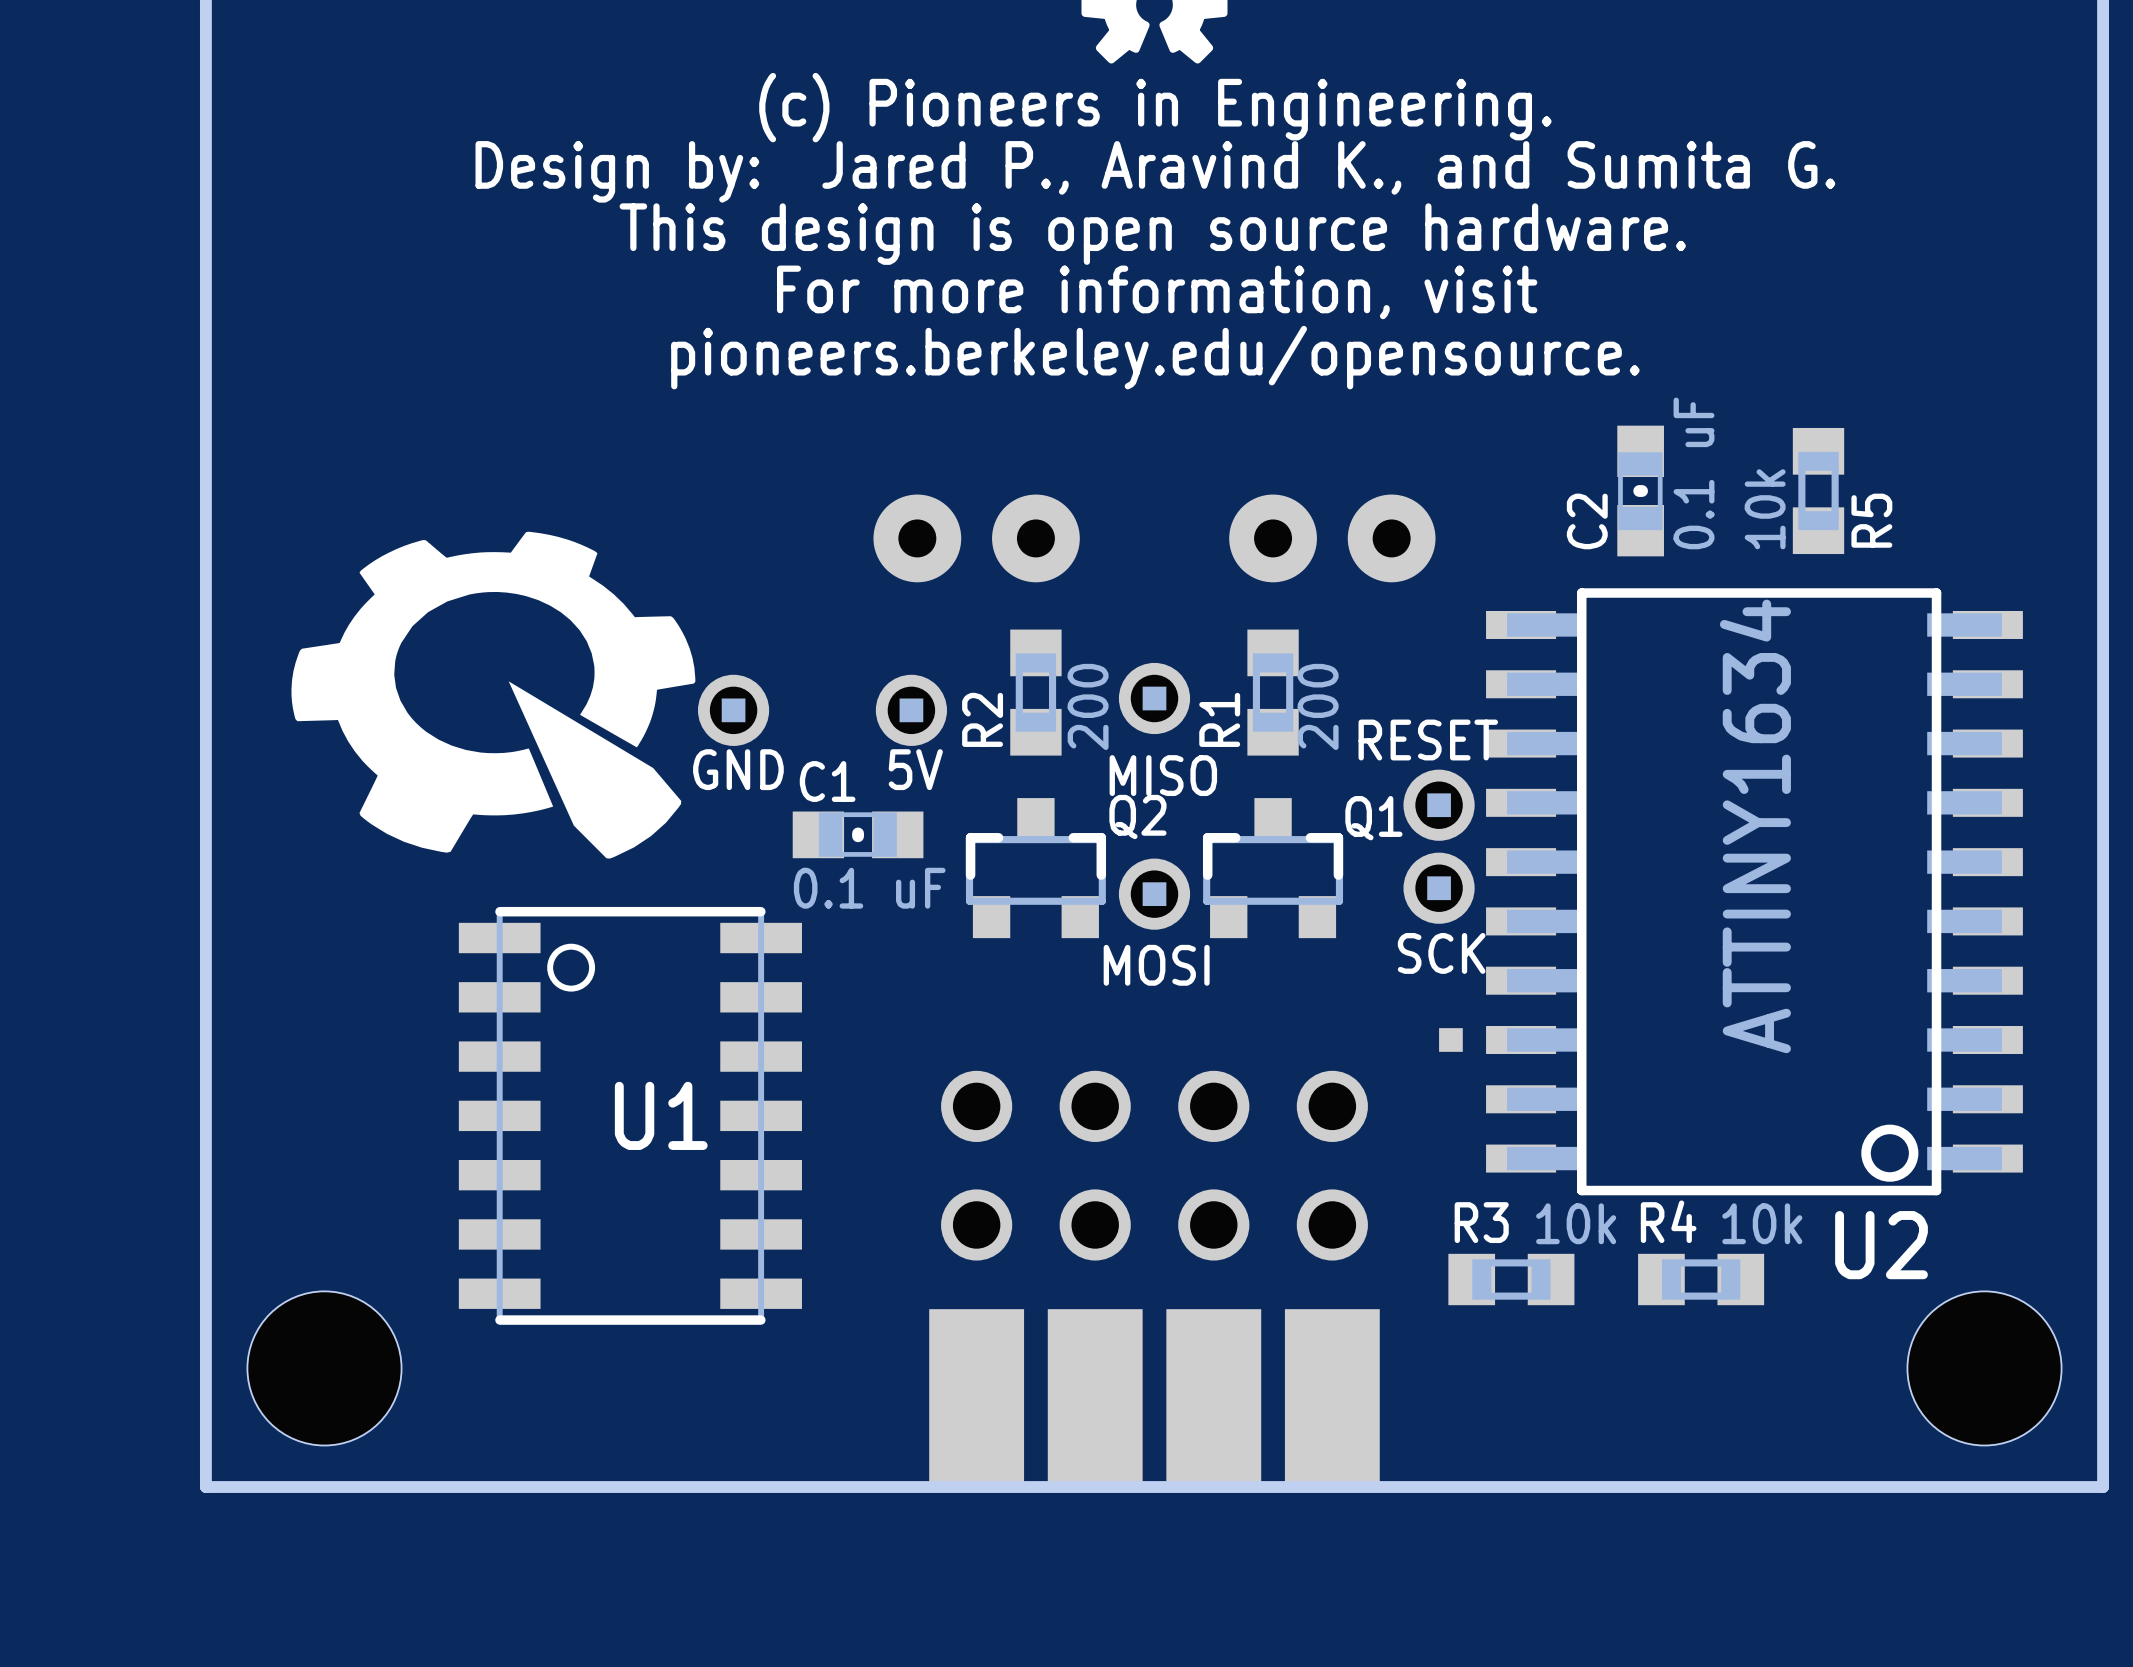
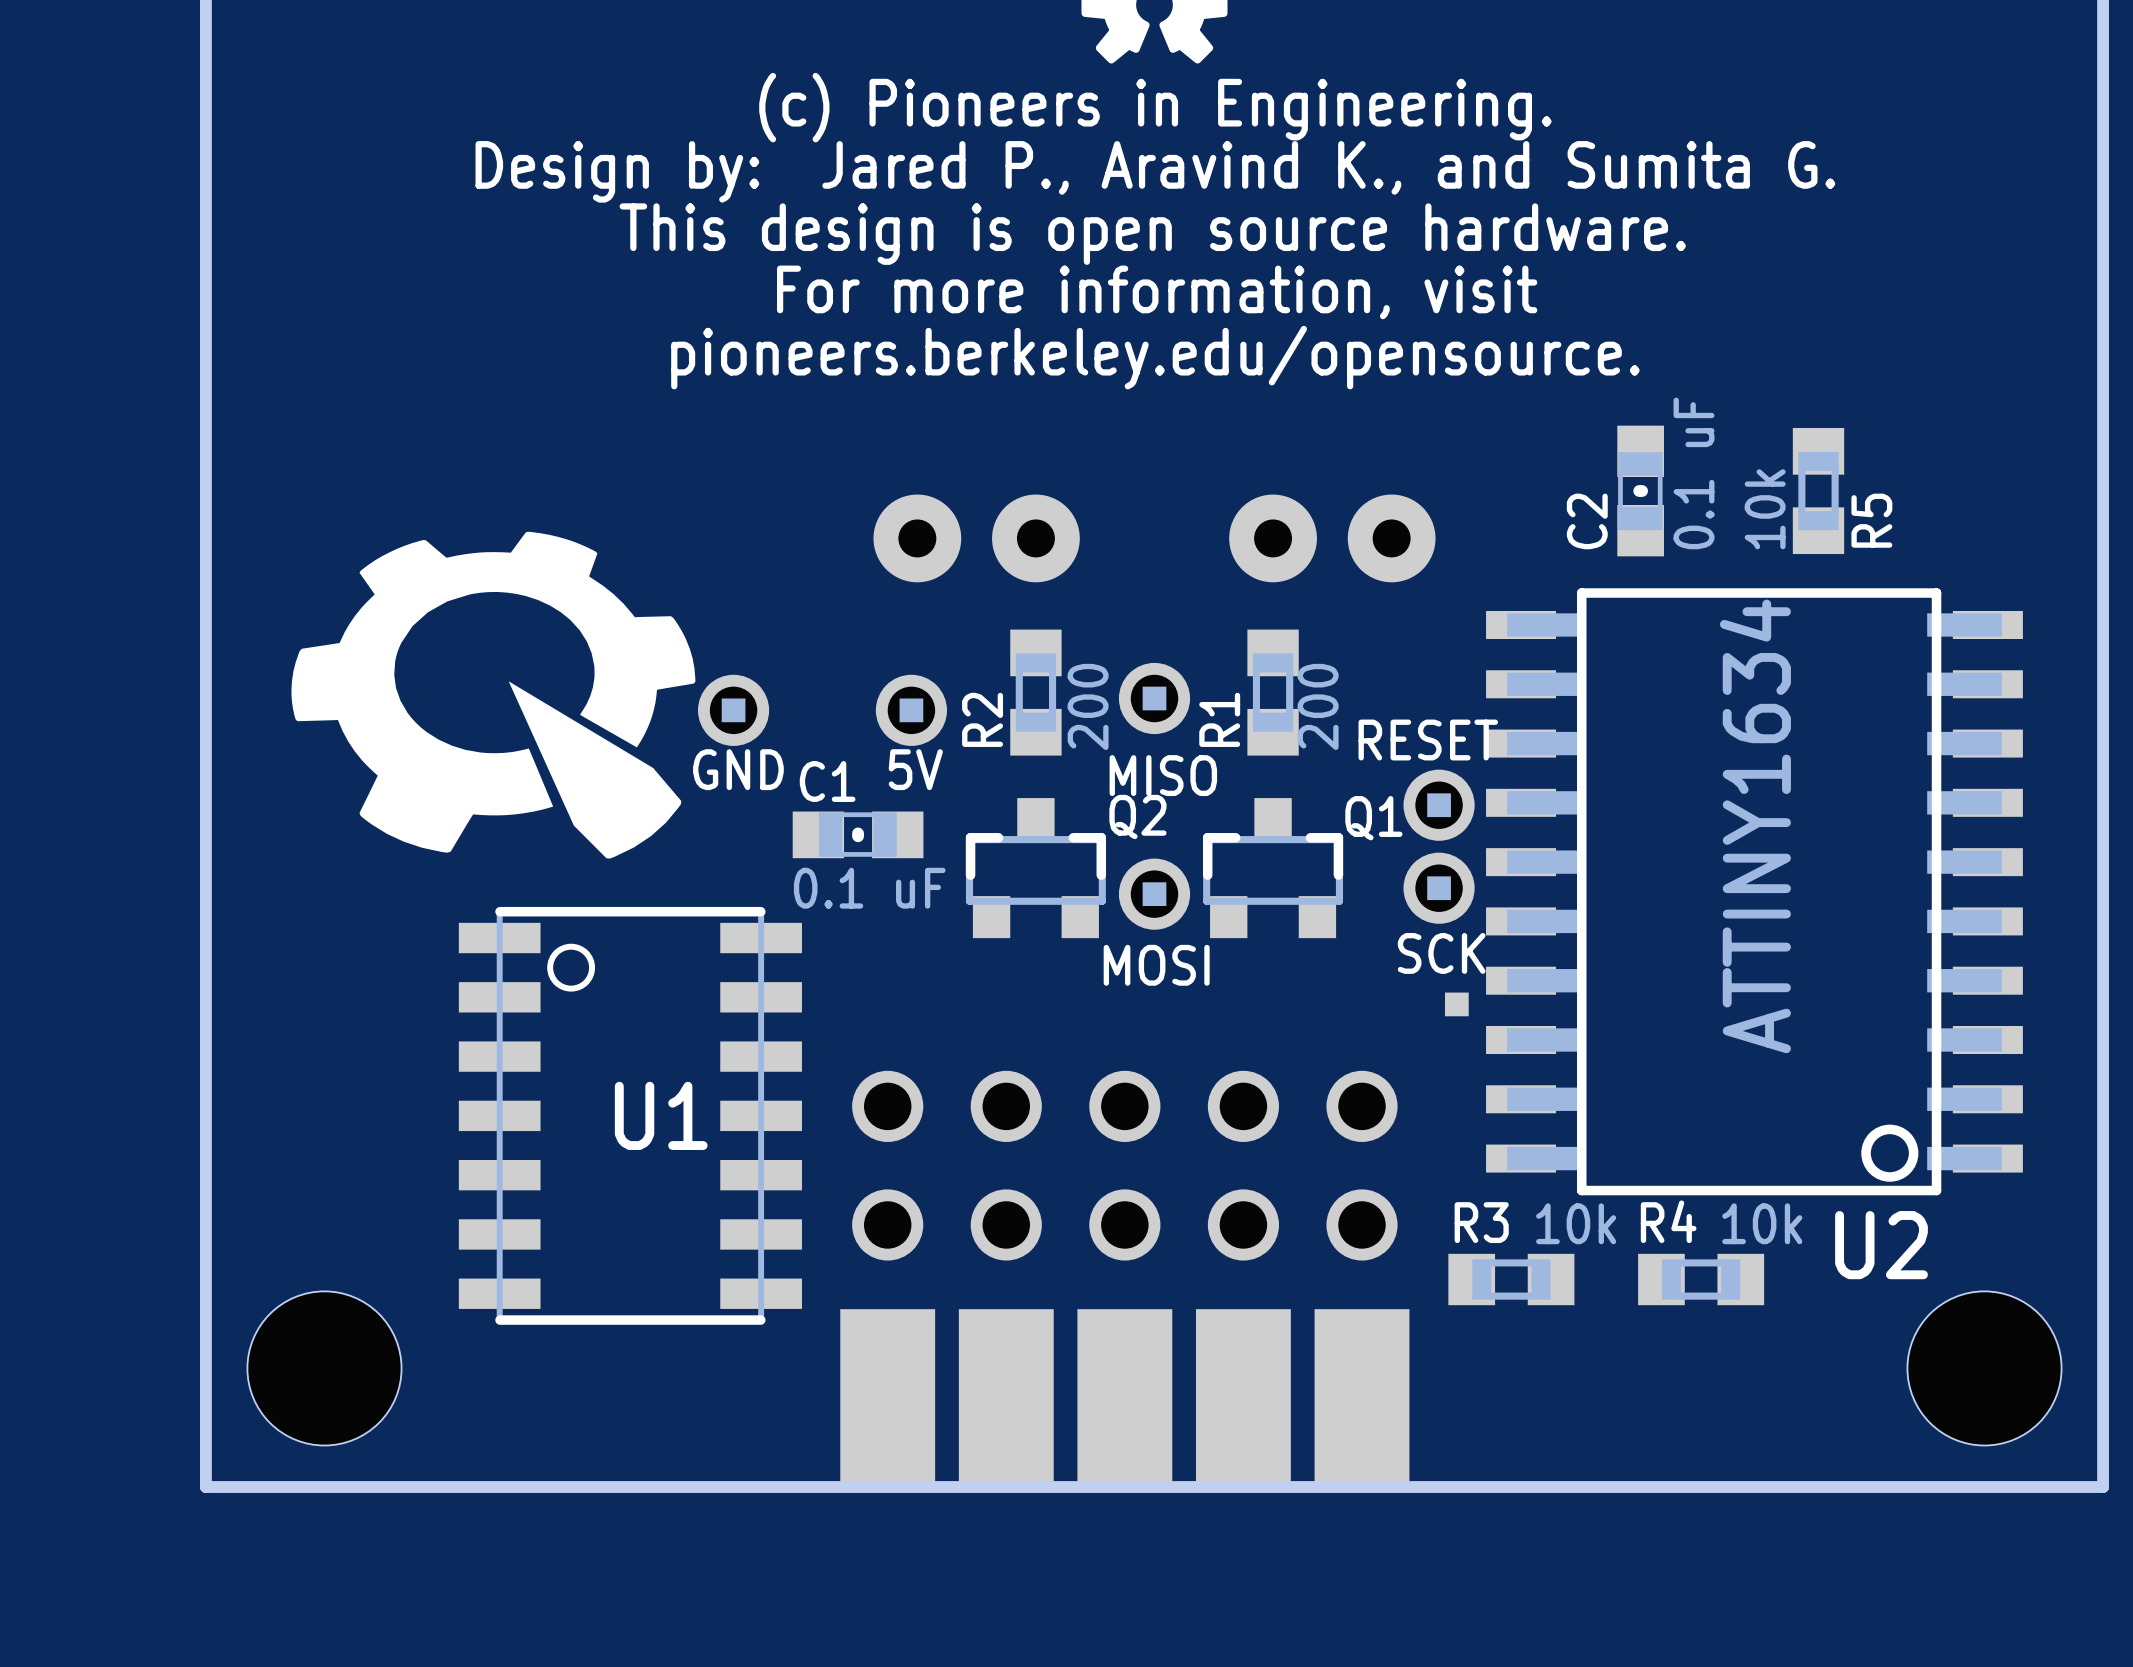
part position: (1450, 1039) -> (1456, 1004)
part footprint: [941, 1070, 1368, 1261] -> [852, 1070, 1398, 1261]
part footprint: [929, 1309, 1380, 1488] -> [840, 1309, 1410, 1488]

